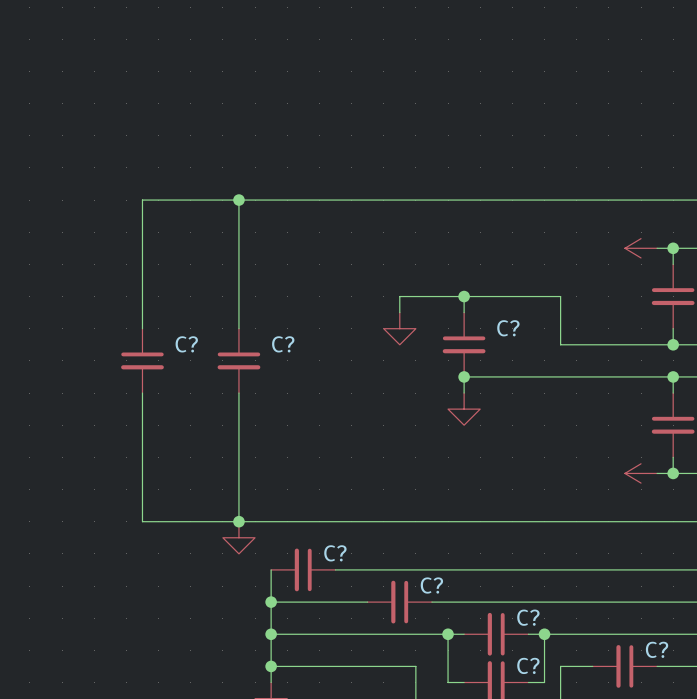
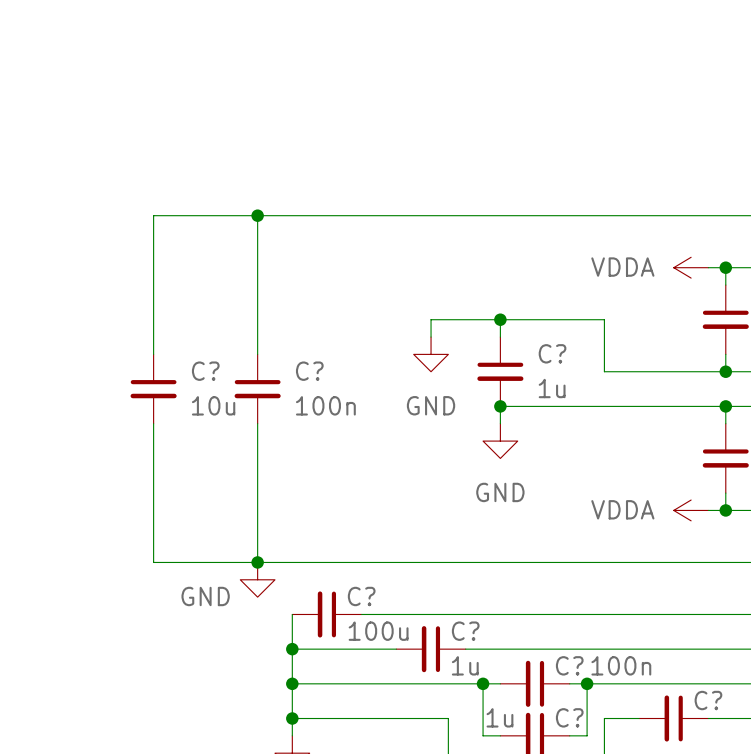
power symbol text: none -> VDDA (622, 267)
C? value: none -> 1u (552, 388)
C? value: none -> 10u (213, 405)
C? value: none -> 100n (325, 405)
power symbol text: none -> GND (431, 405)
power symbol text: none -> GND (500, 492)
power symbol text: none -> VDDA (622, 509)
power symbol text: none -> GND (205, 596)
C? value: none -> 100u (378, 631)
C? value: none -> 1u (465, 665)
C? value: none -> 100n (621, 665)
C? value: none -> 1u (499, 717)

